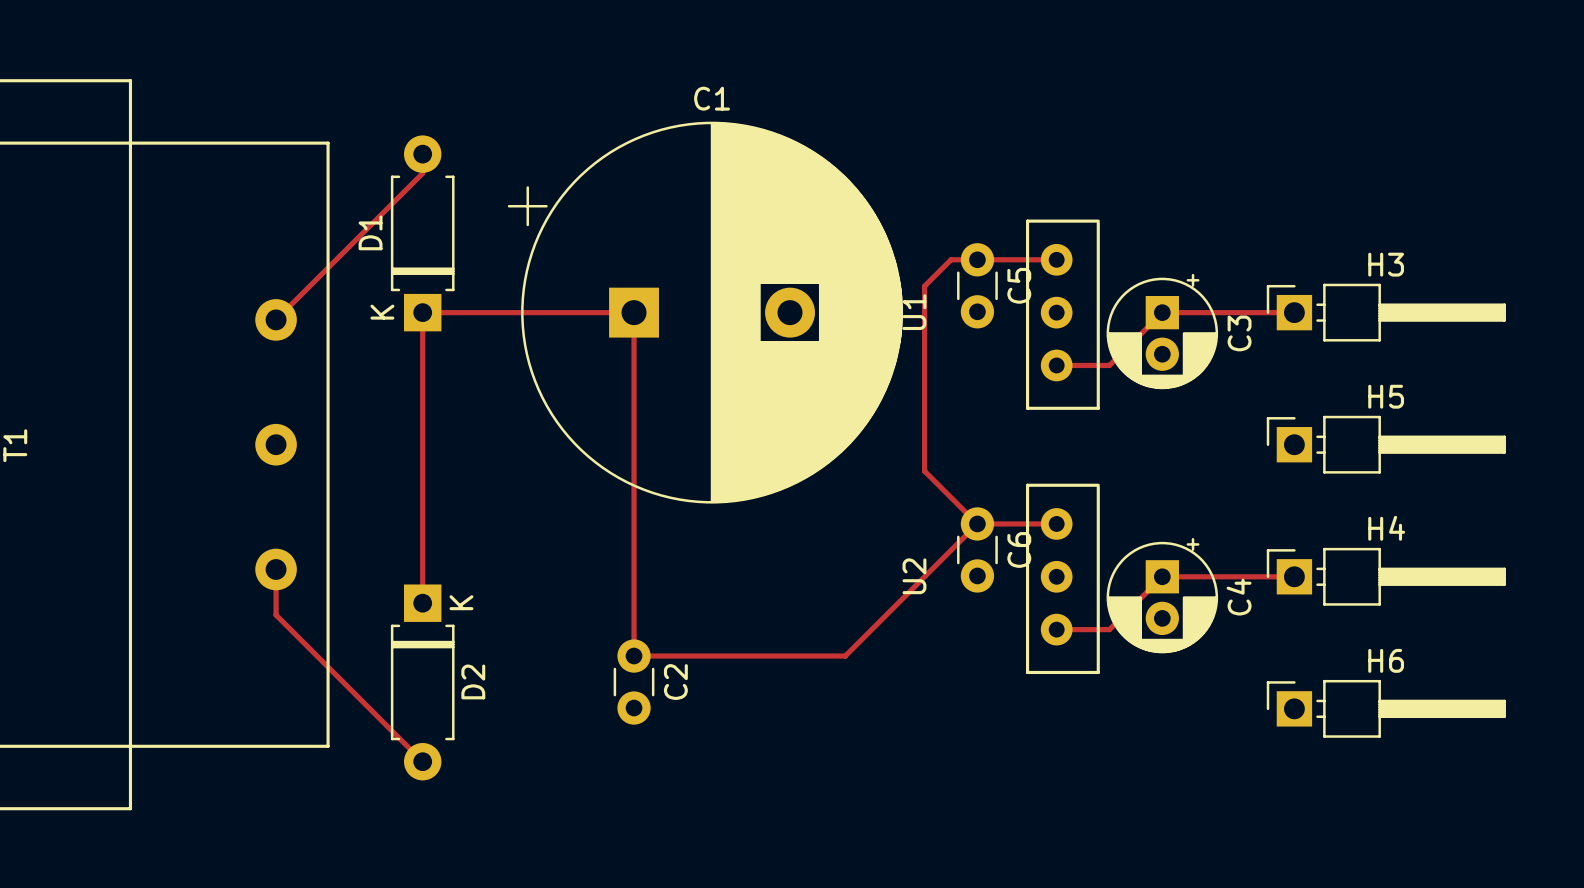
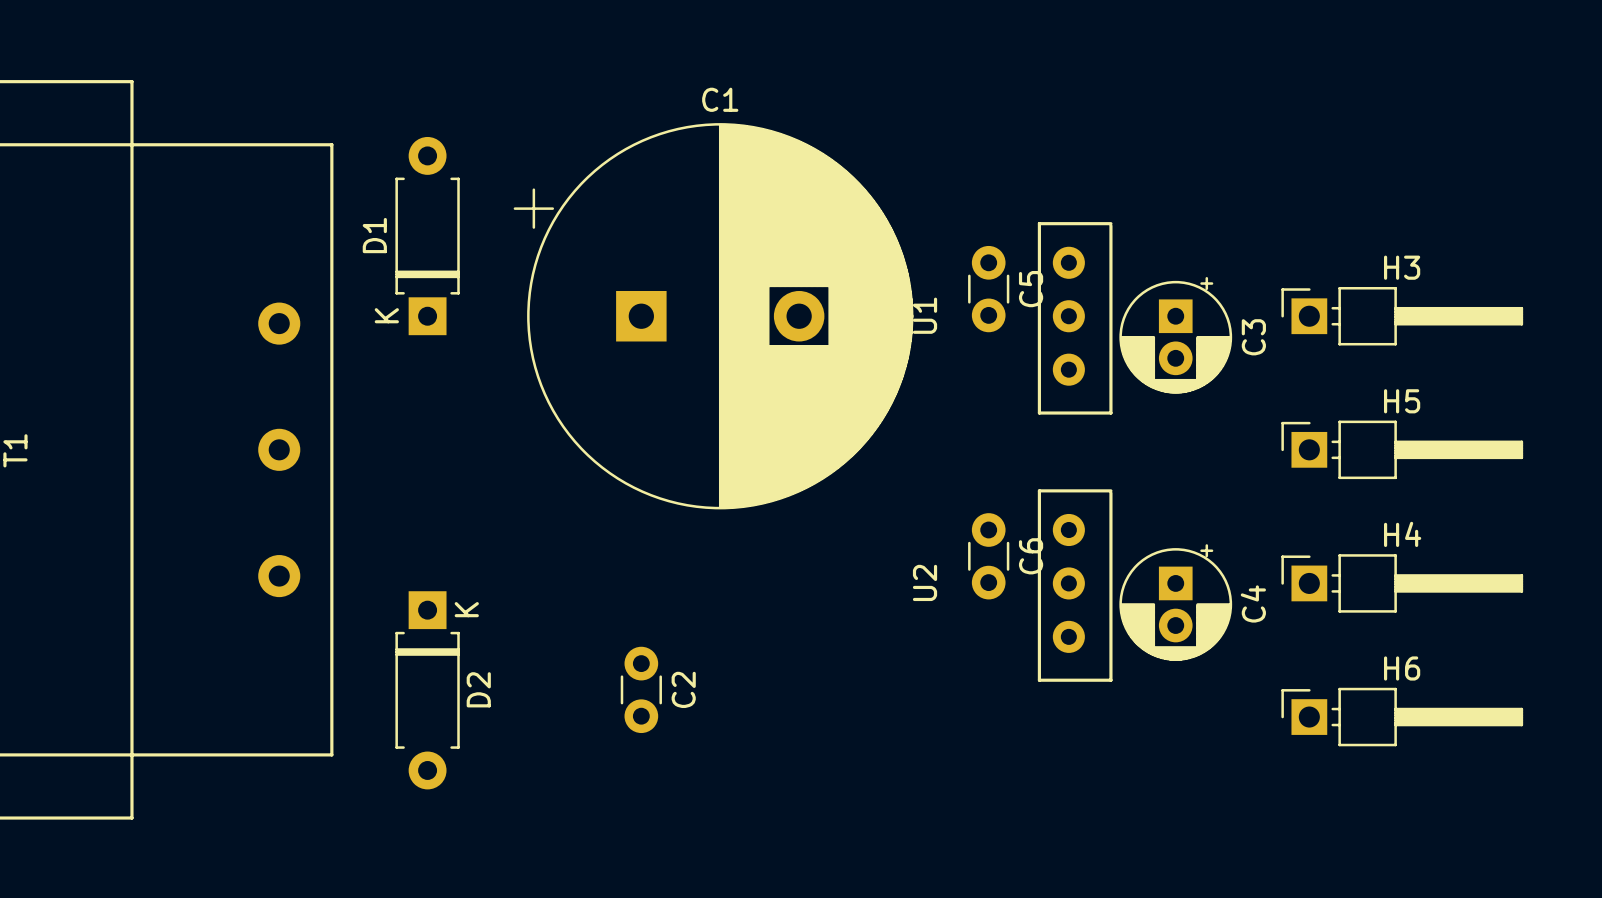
track: (422, 154) (422, 173) (276, 319) -> none
track: (1056, 259) (951, 259) (924, 286) (924, 471) (977, 523) -> none
track: (1294, 312) (1162, 312) (1109, 365) (1056, 365) -> none
track: (977, 523) (845, 656) (634, 656) (634, 312) (422, 312) (422, 603) -> none
track: (977, 523) (1056, 523) -> none
track: (276, 569) (276, 615) (422, 761) -> none
track: (1294, 576) (1162, 576) (1109, 629) (1056, 629) -> none

